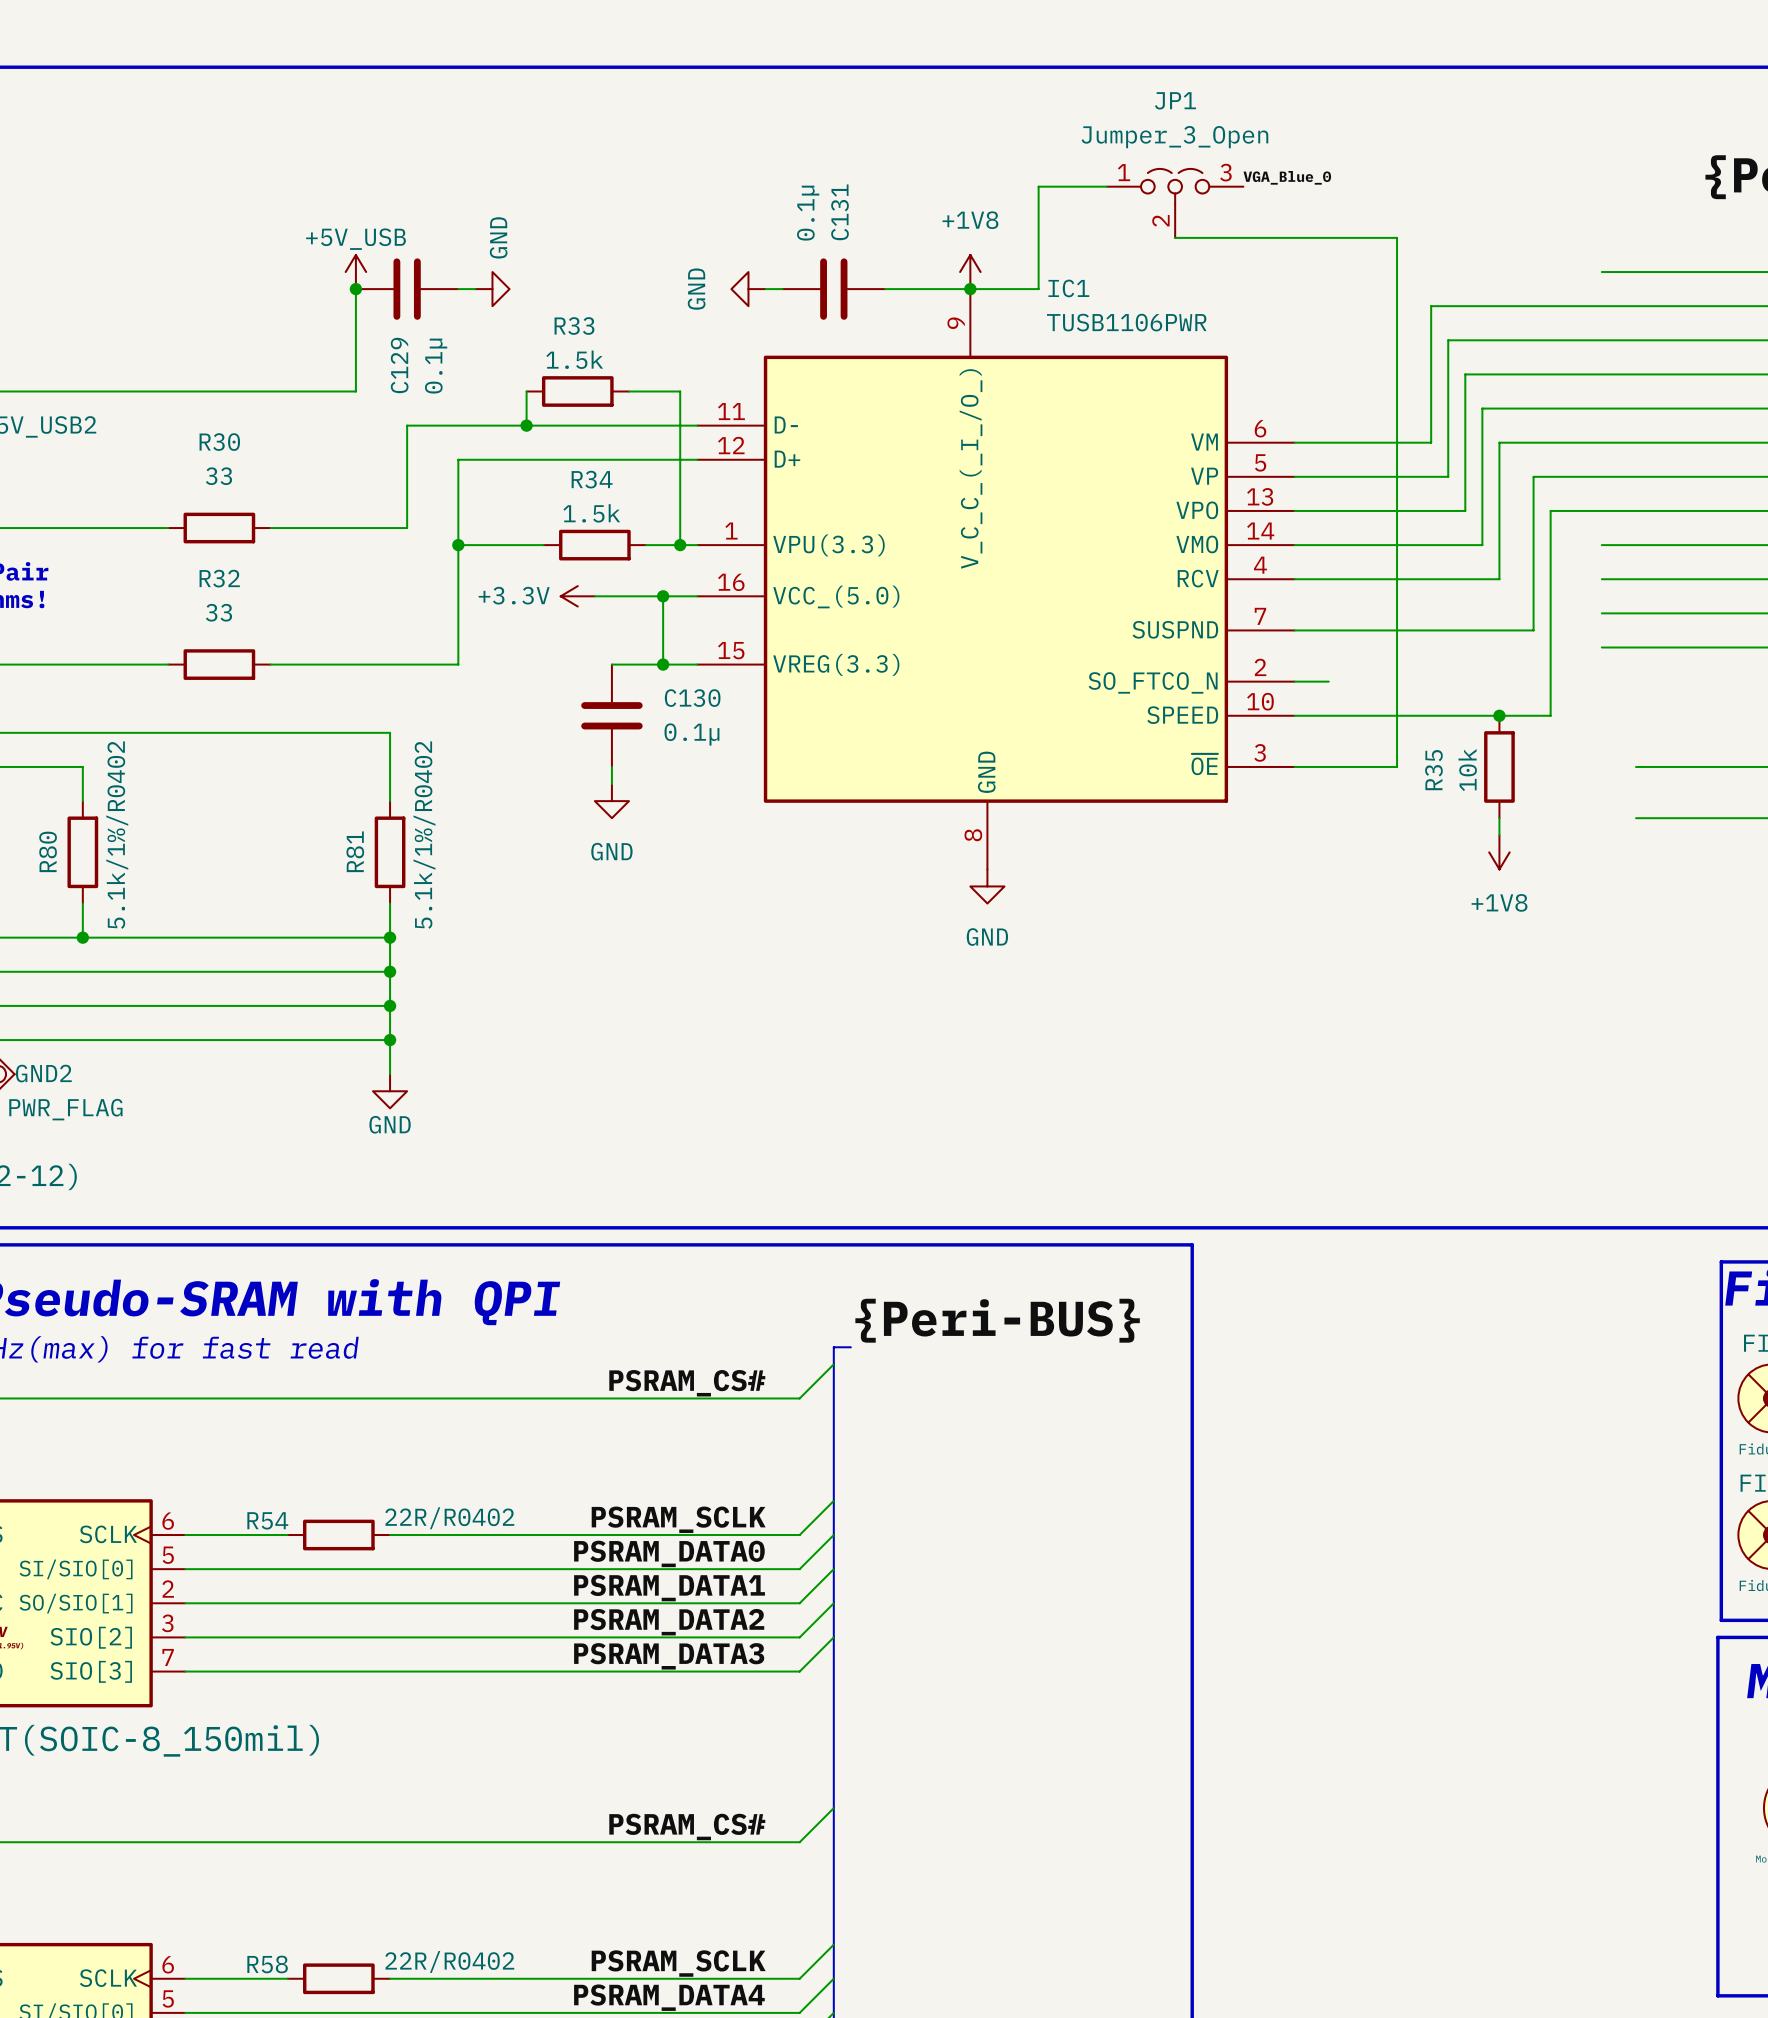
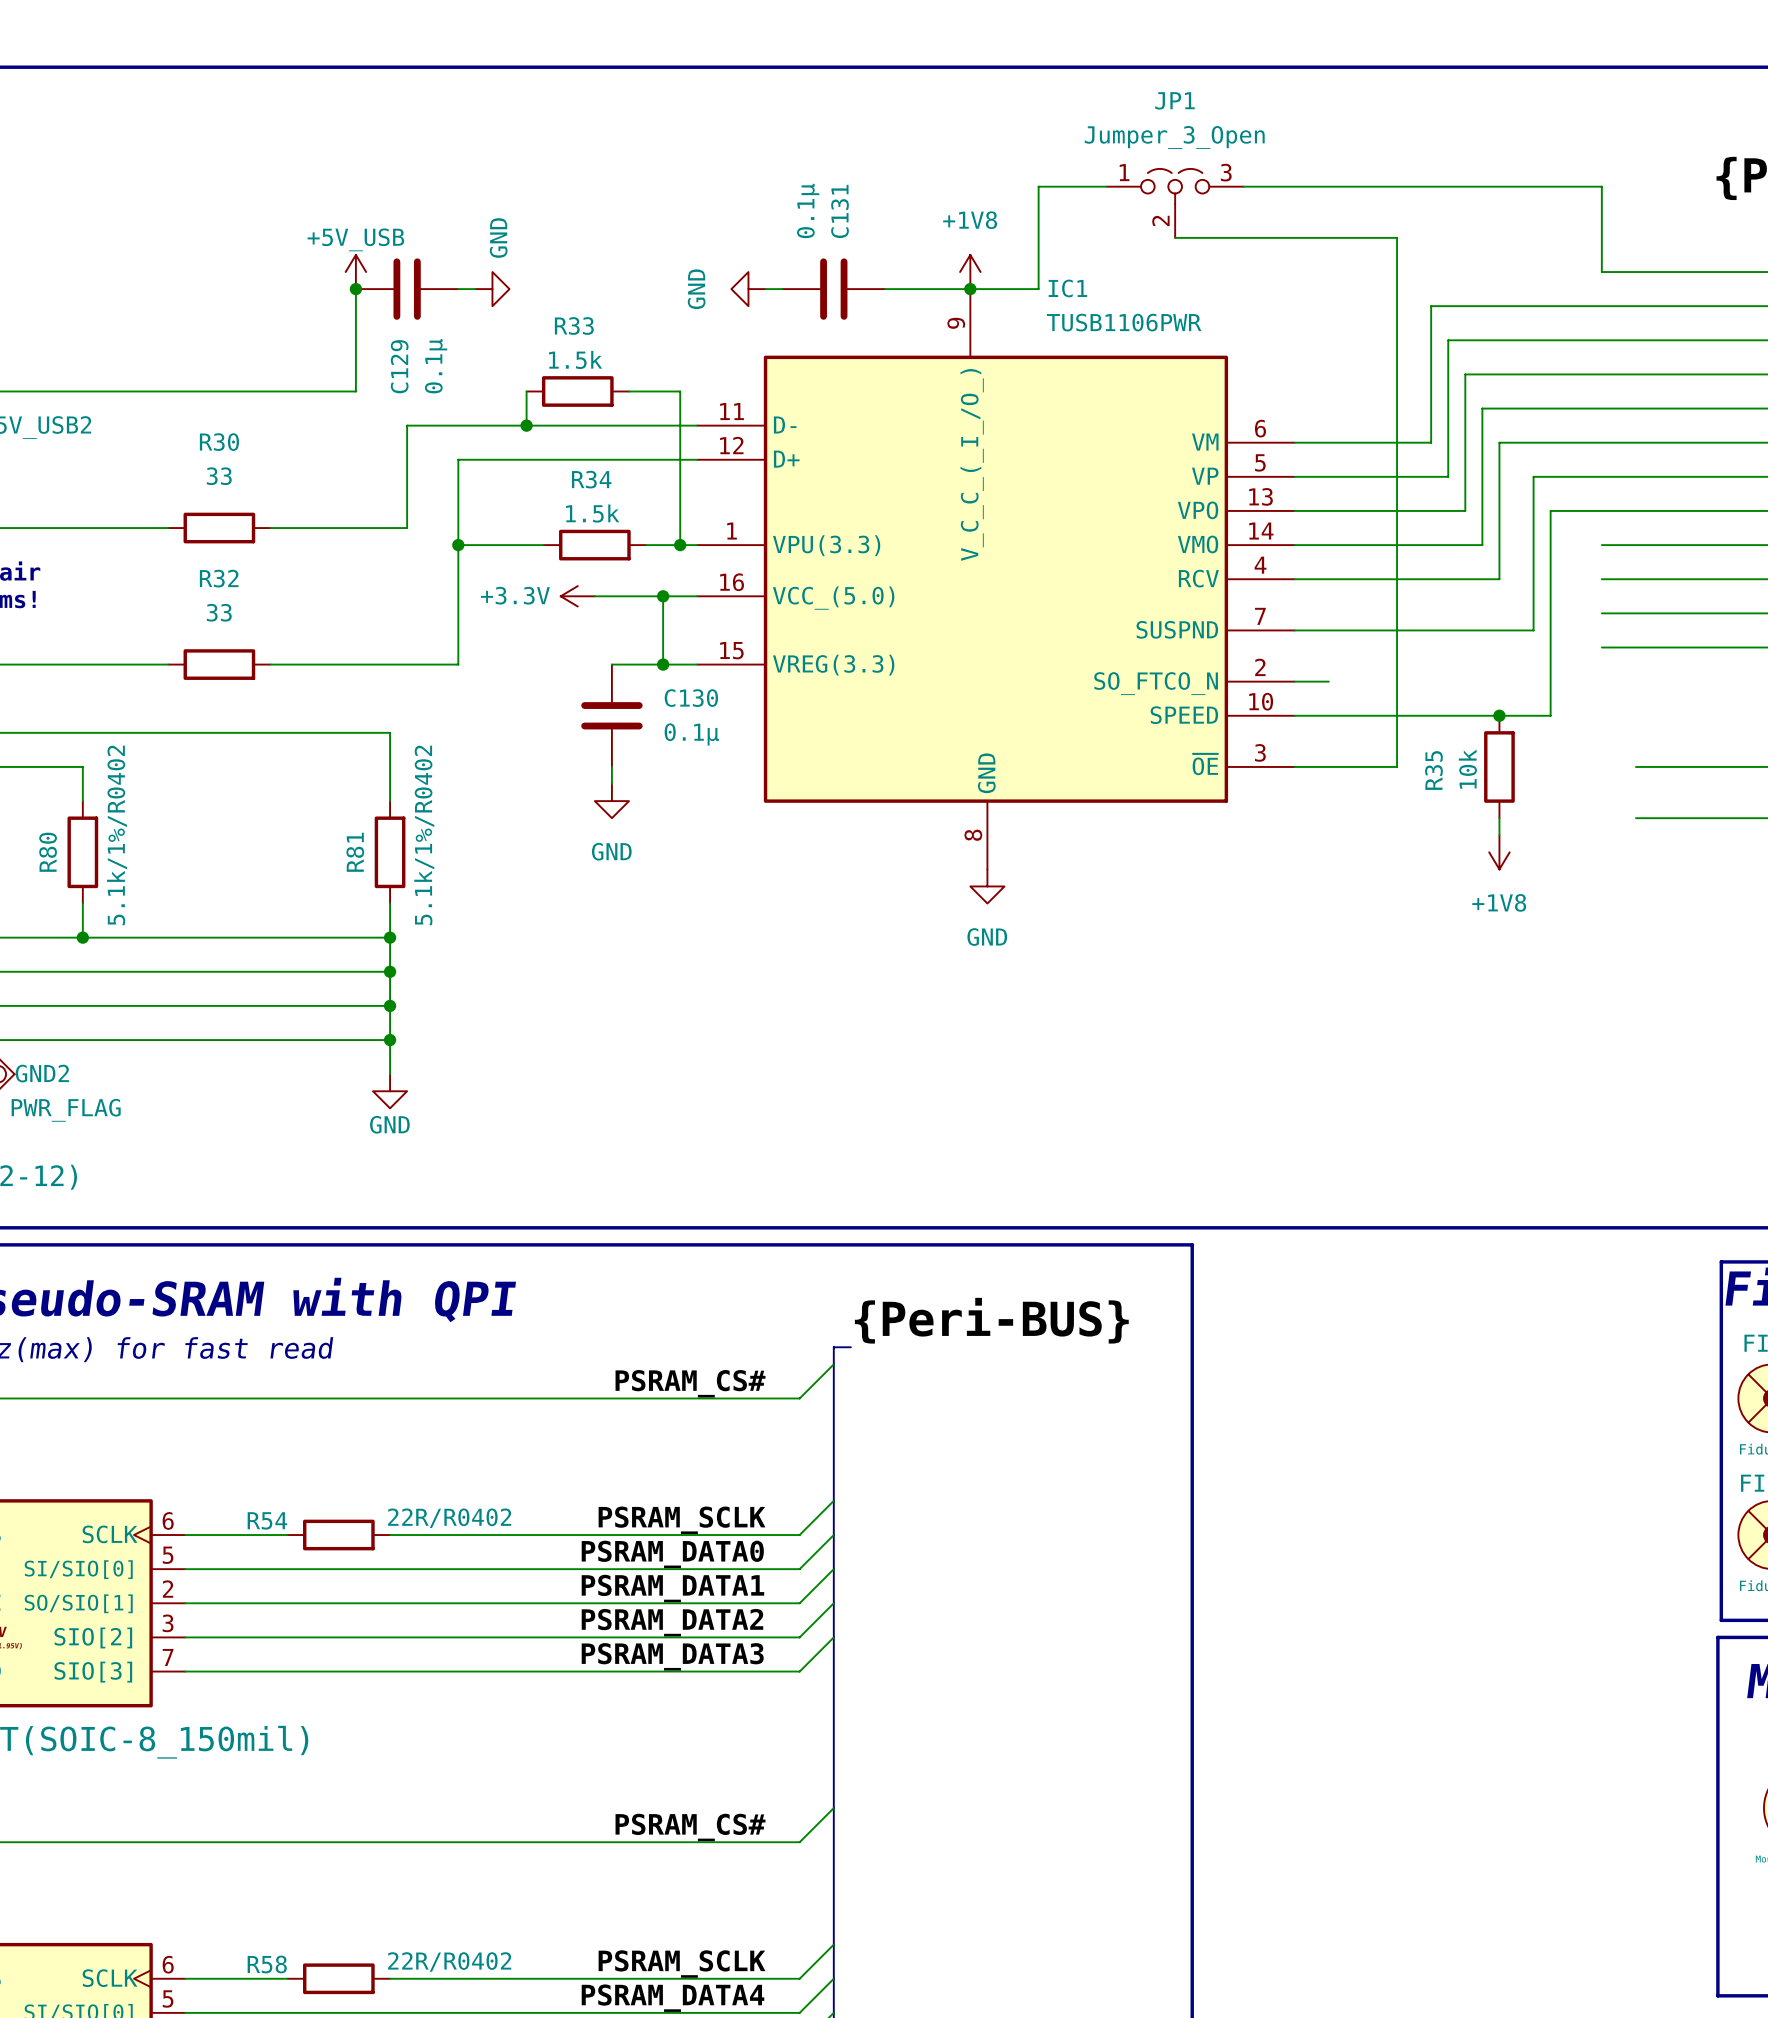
label: VGA_Blue_0 (1287, 177) -> none
wire: none -> (1243, 186) (1601, 186) (1601, 272)

